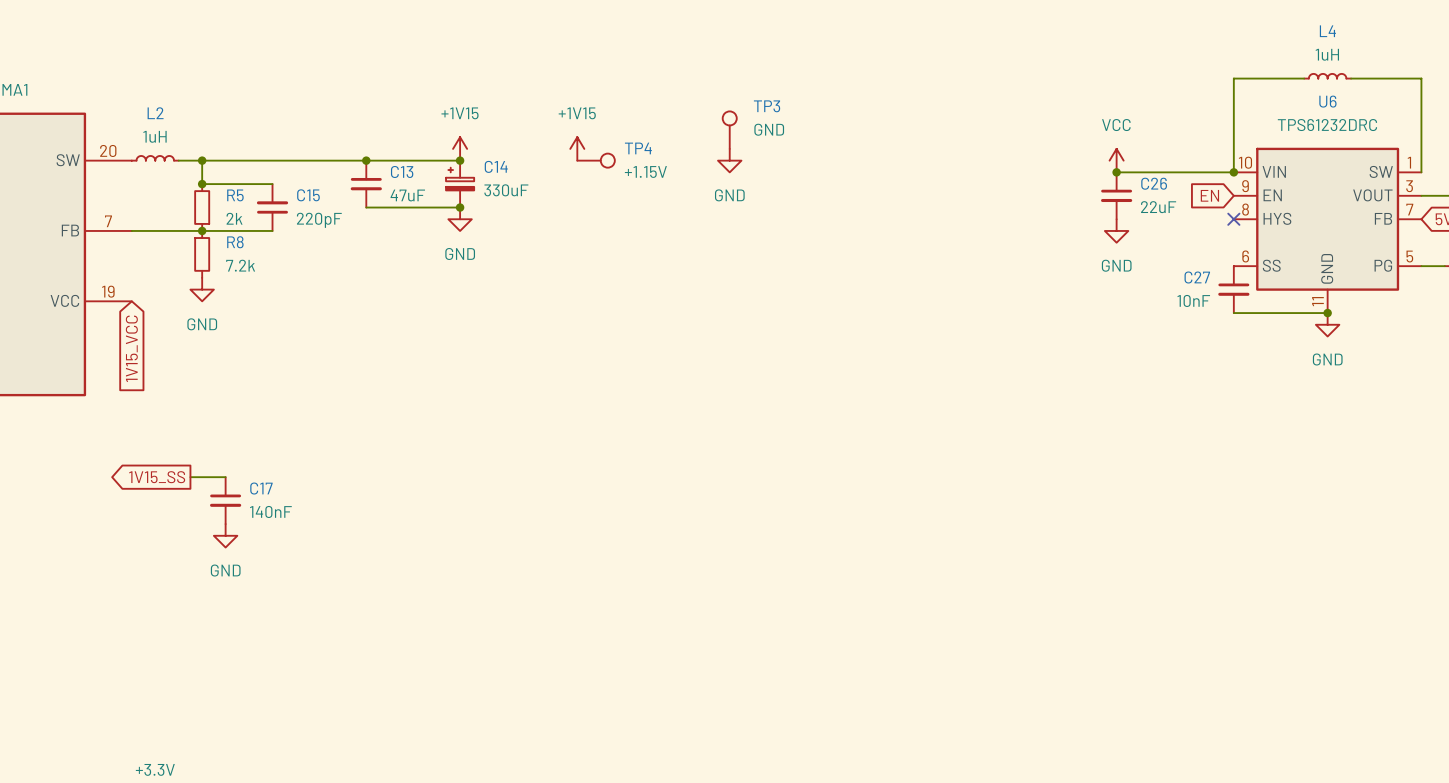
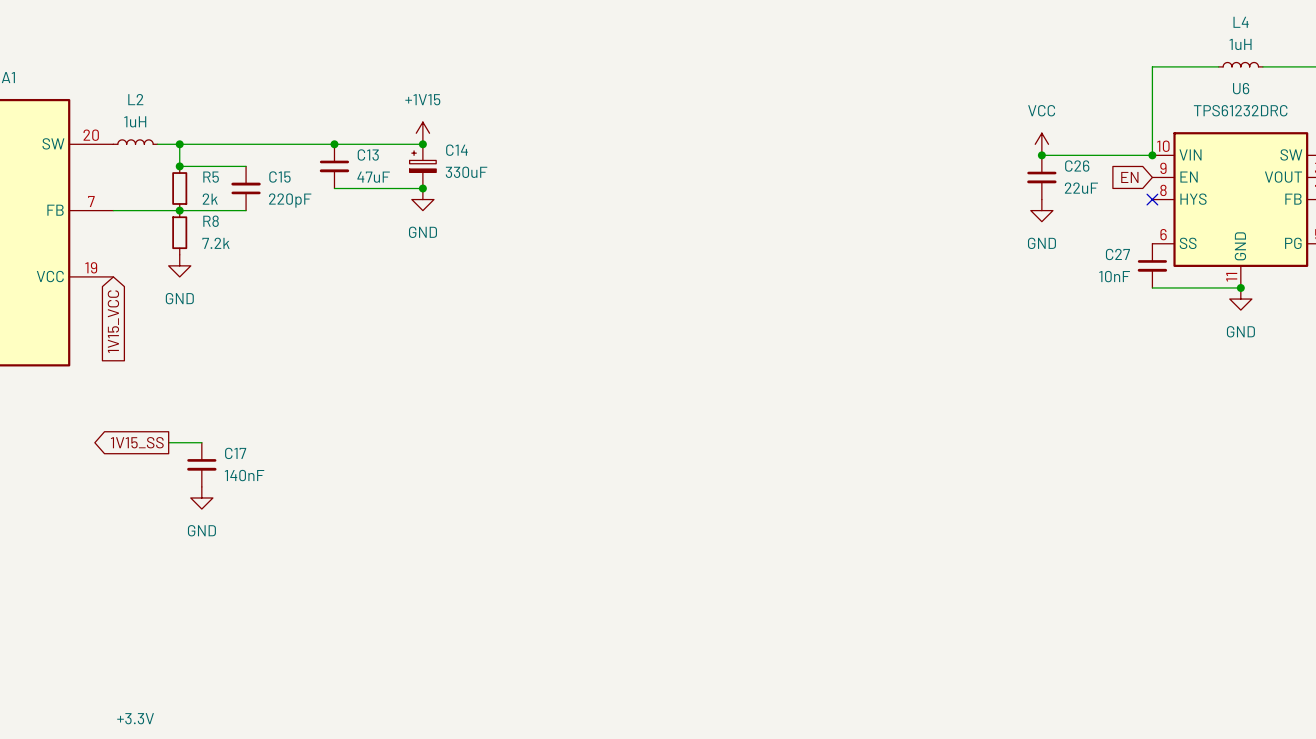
TP3: GND (729, 130) -> none
power symbol: +1V15 (577, 148) -> none
TP4: +1.15V (596, 160) -> none
power symbol: GND (729, 160) -> none

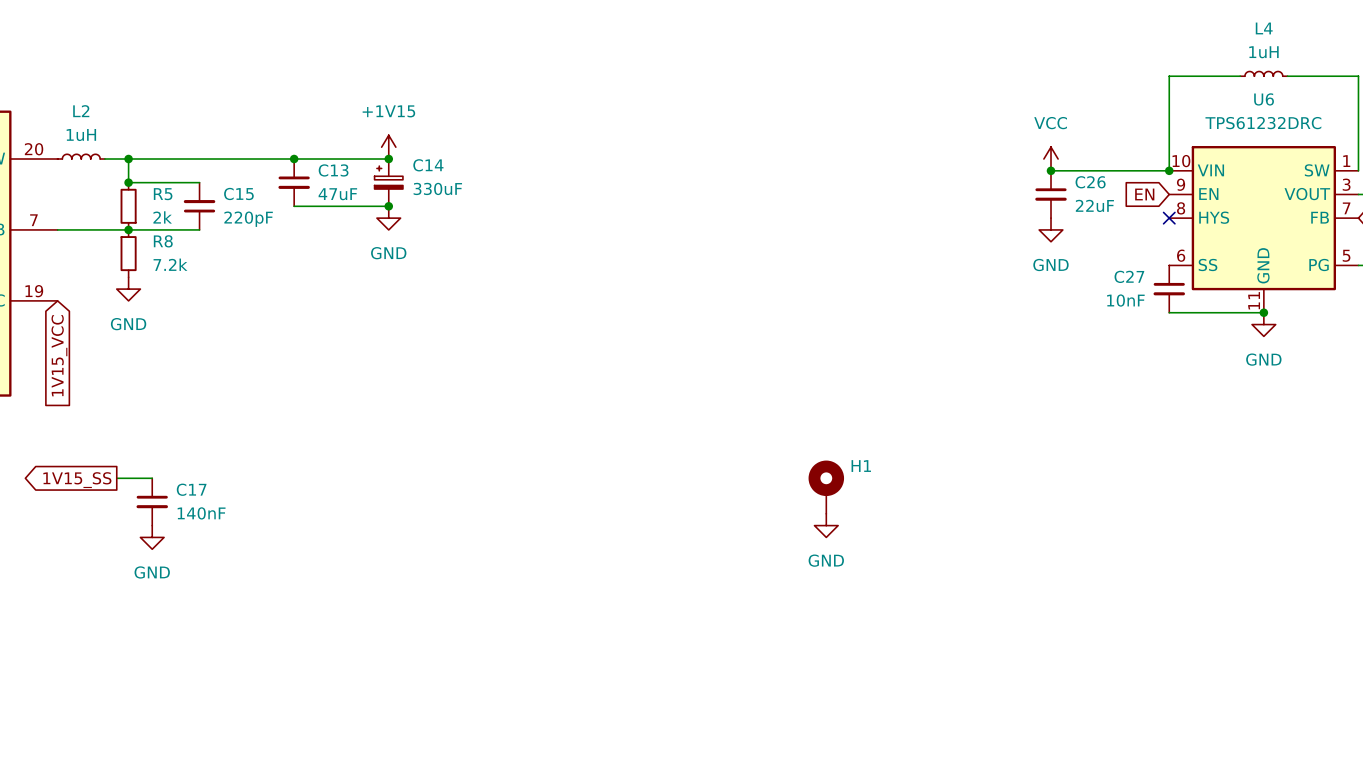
H1: none -> (826, 487)
power symbol: none -> GND (826, 525)

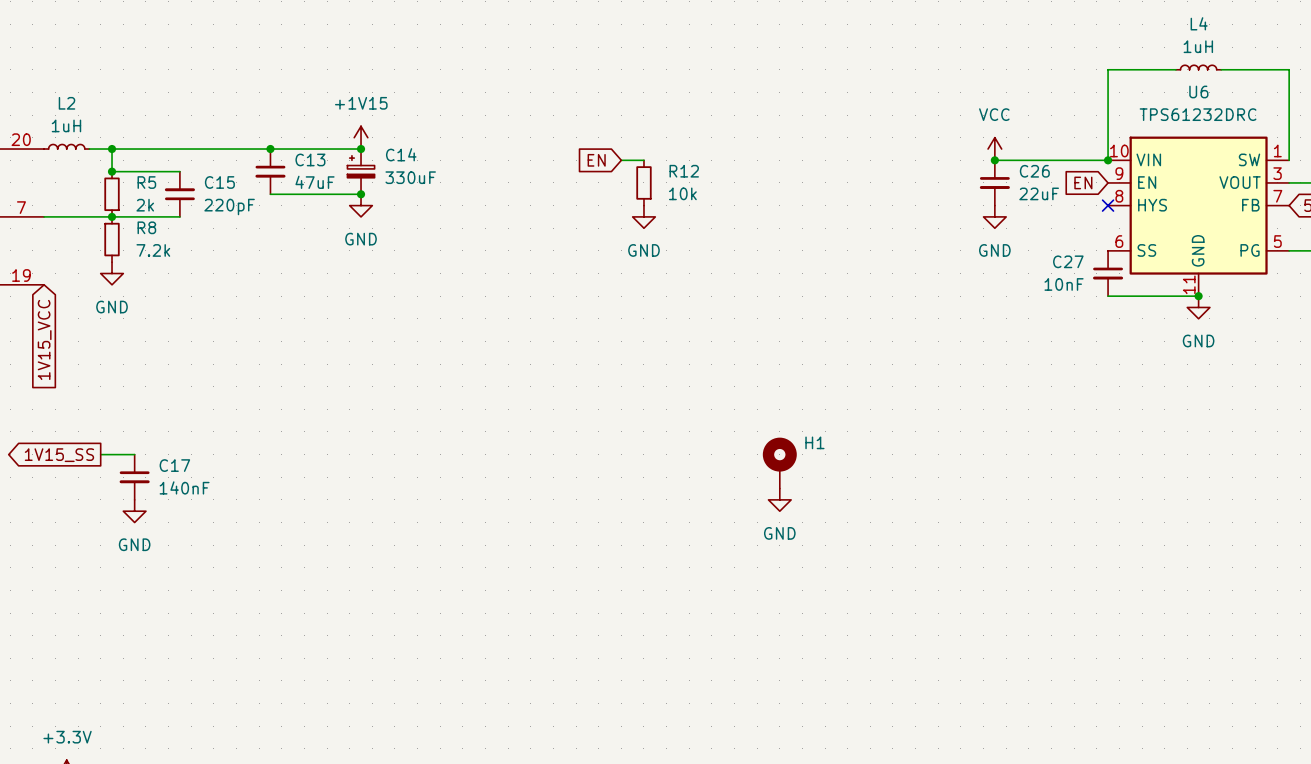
global label: none -> EN (596, 160)
wire: none -> (621, 160) (643, 160)
R12: none -> 10k (643, 182)
power symbol: none -> GND (643, 216)

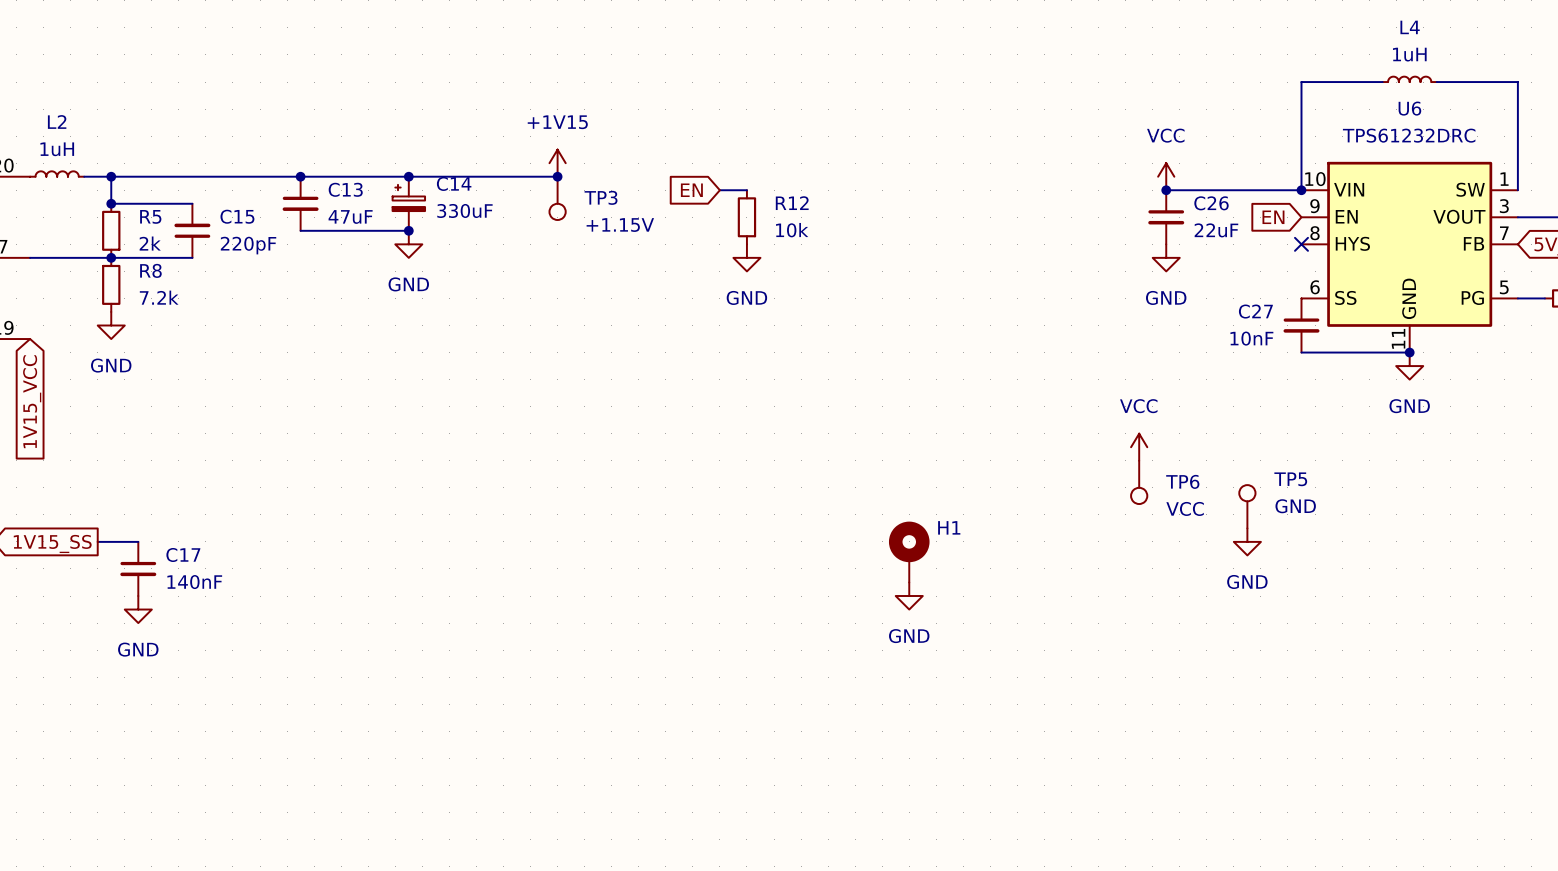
power symbol position: +1V15 (361, 137) -> +1V15 (557, 163)
wire: none -> (408, 176) (557, 176)
junction: none -> (557, 176)
TP3: none -> +1.15V (557, 198)
power symbol: none -> VCC (1139, 447)
TP6: none -> VCC (1139, 482)
TP5: none -> GND (1247, 506)
power symbol: none -> GND (1247, 541)

